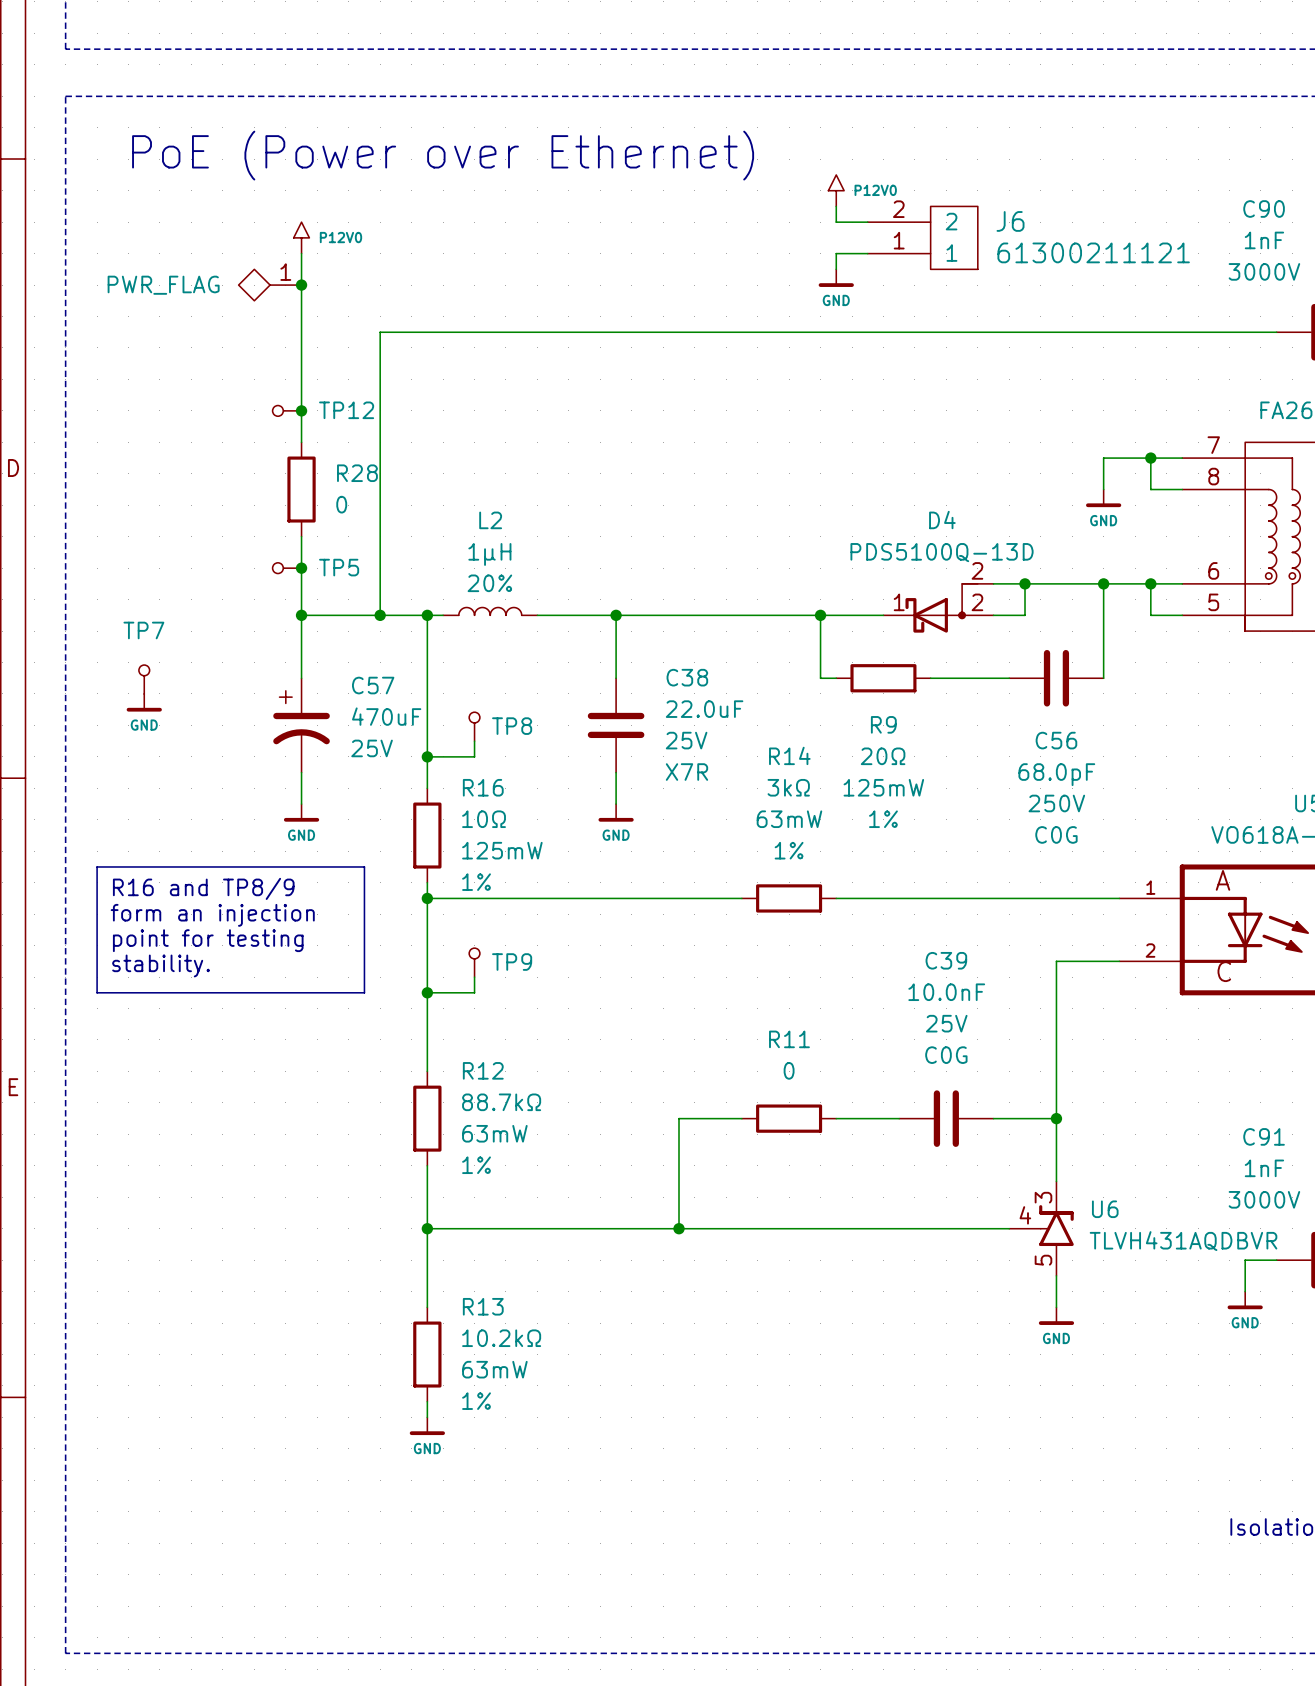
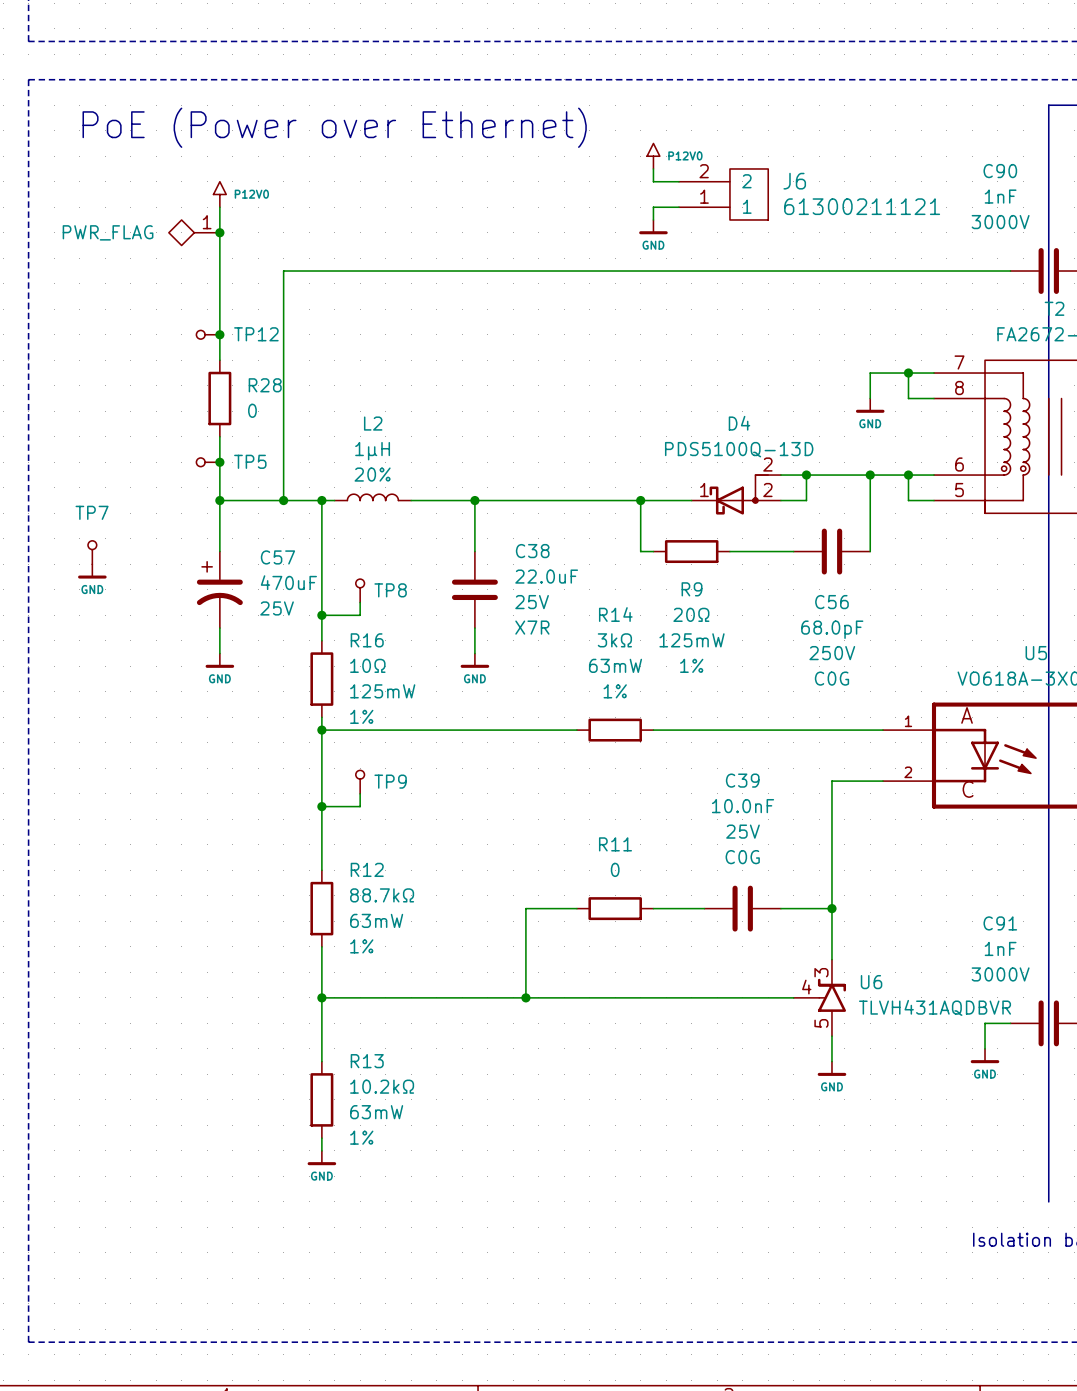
line: (97, 866) (364, 866) (364, 992) (97, 992) (97, 866) -> none
text: R16 and TP8/9 (203, 888) -> none
text: form an injection (212, 915) -> none
text: point for testing (208, 940) -> none
text: stability. (161, 965) -> none

